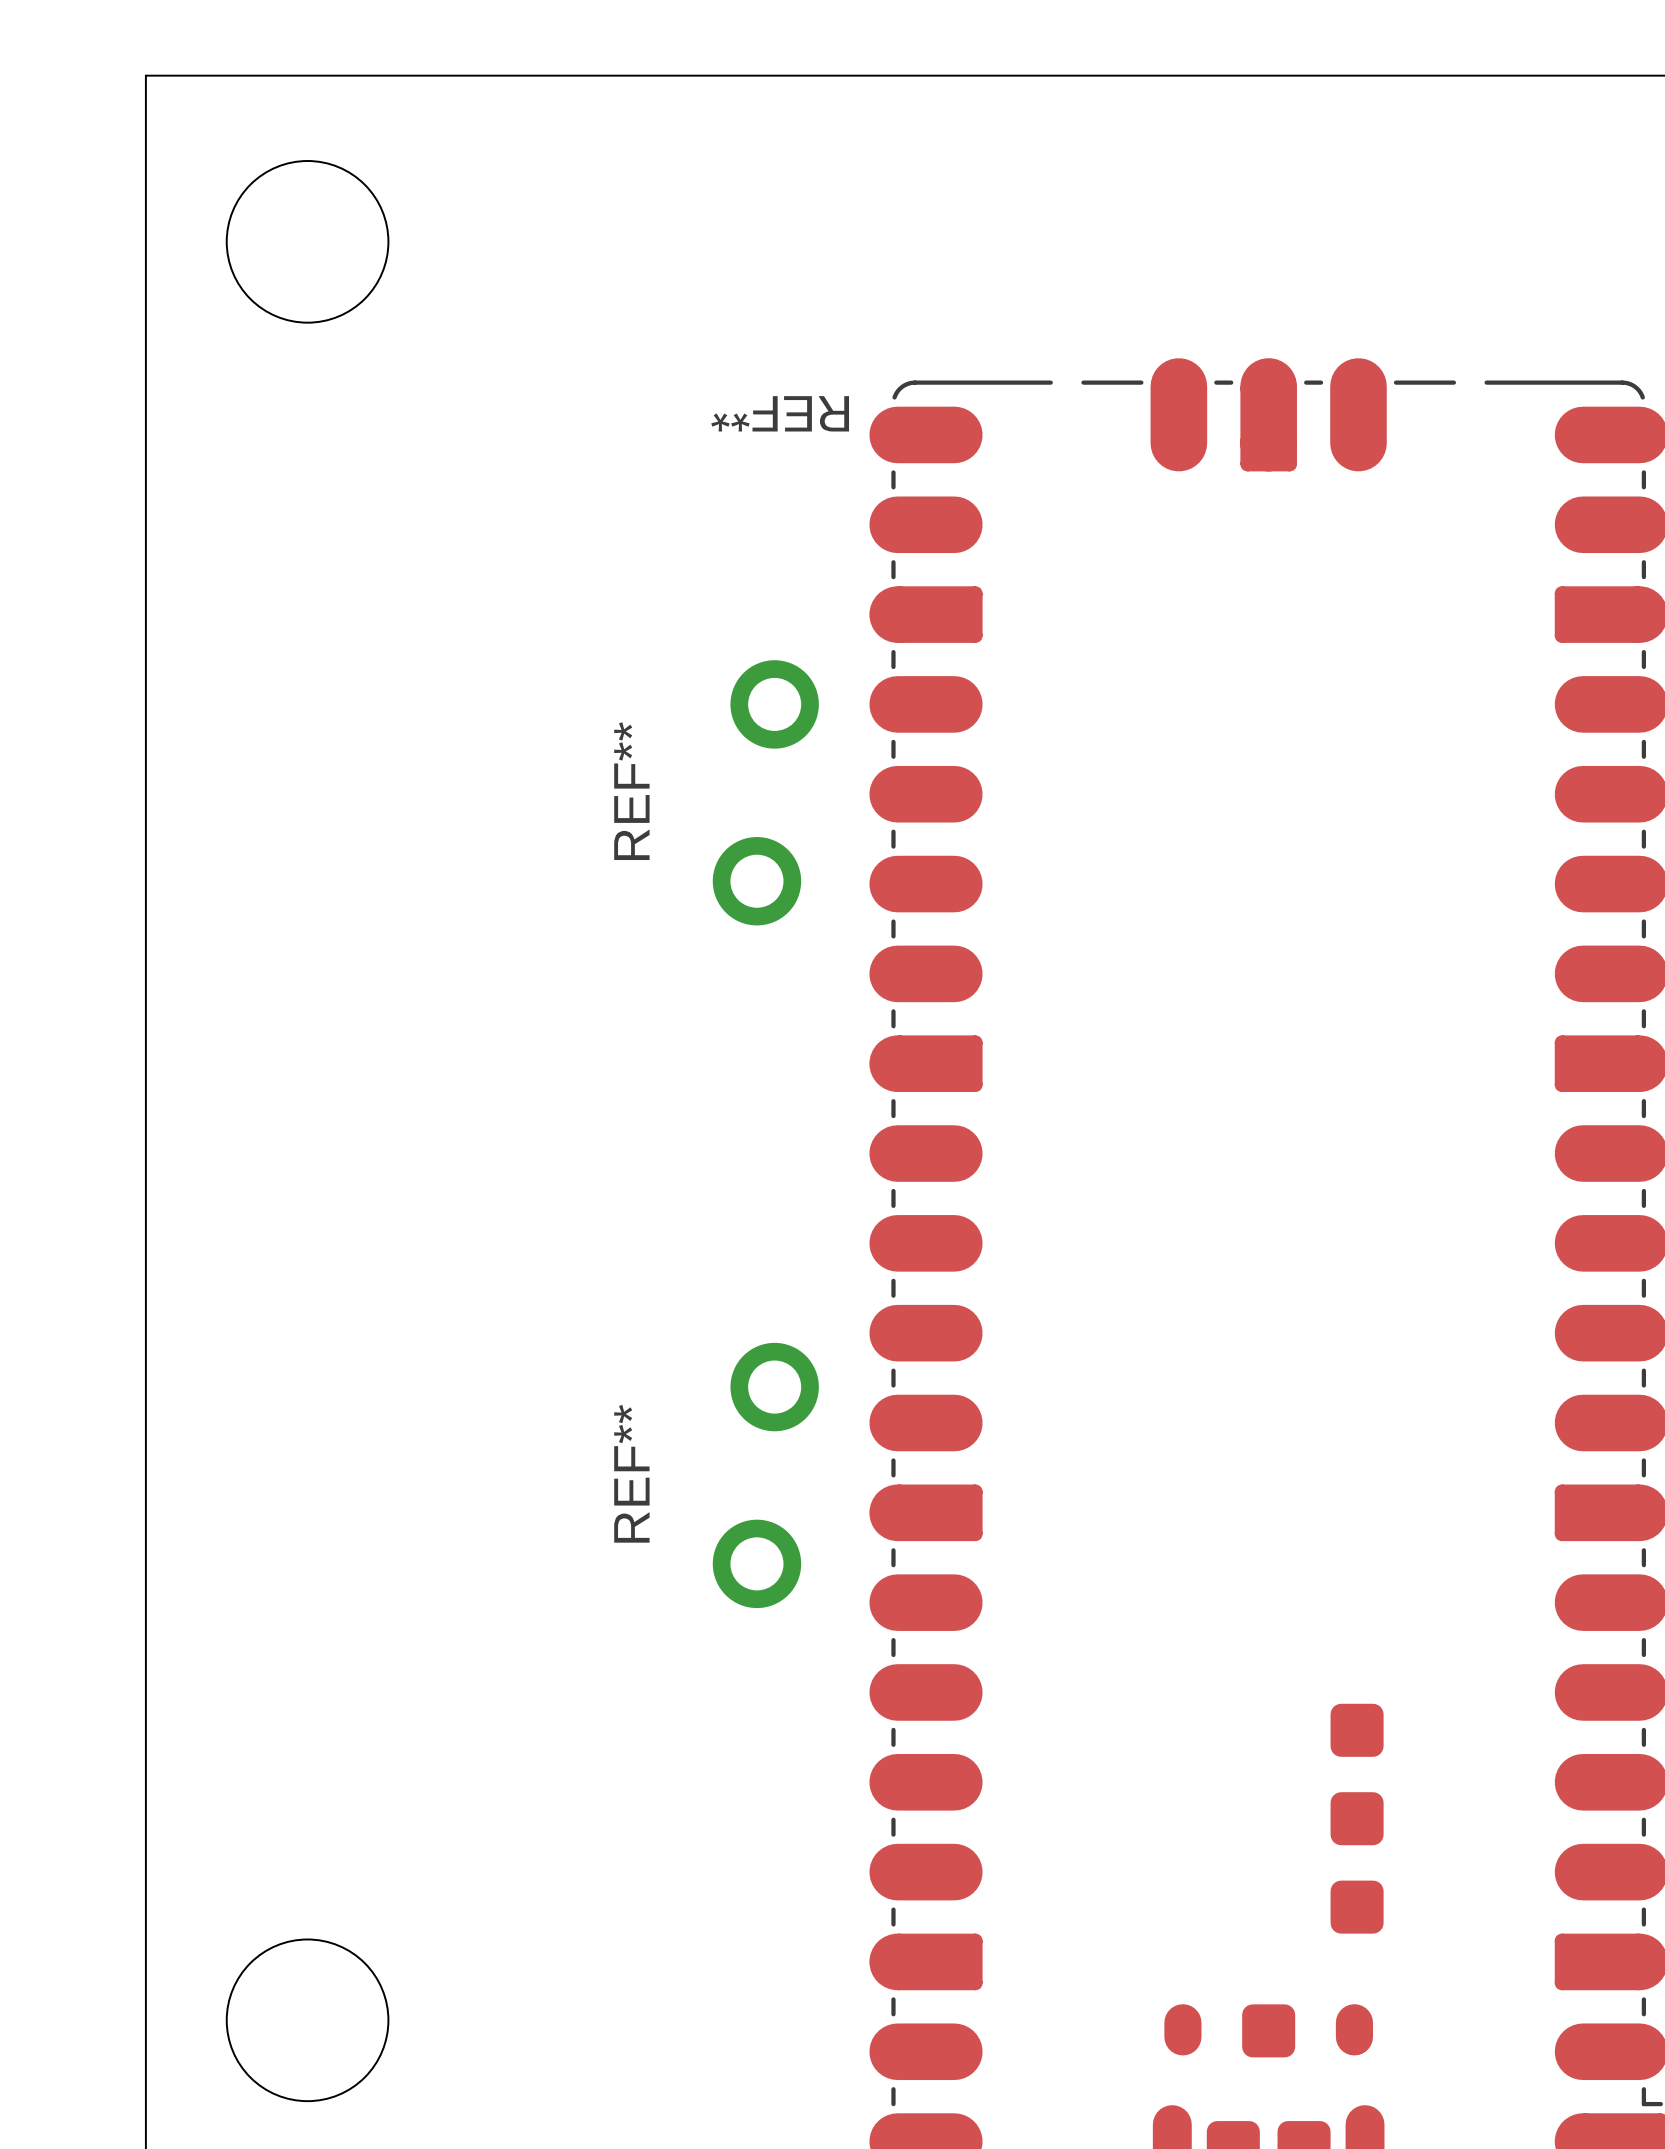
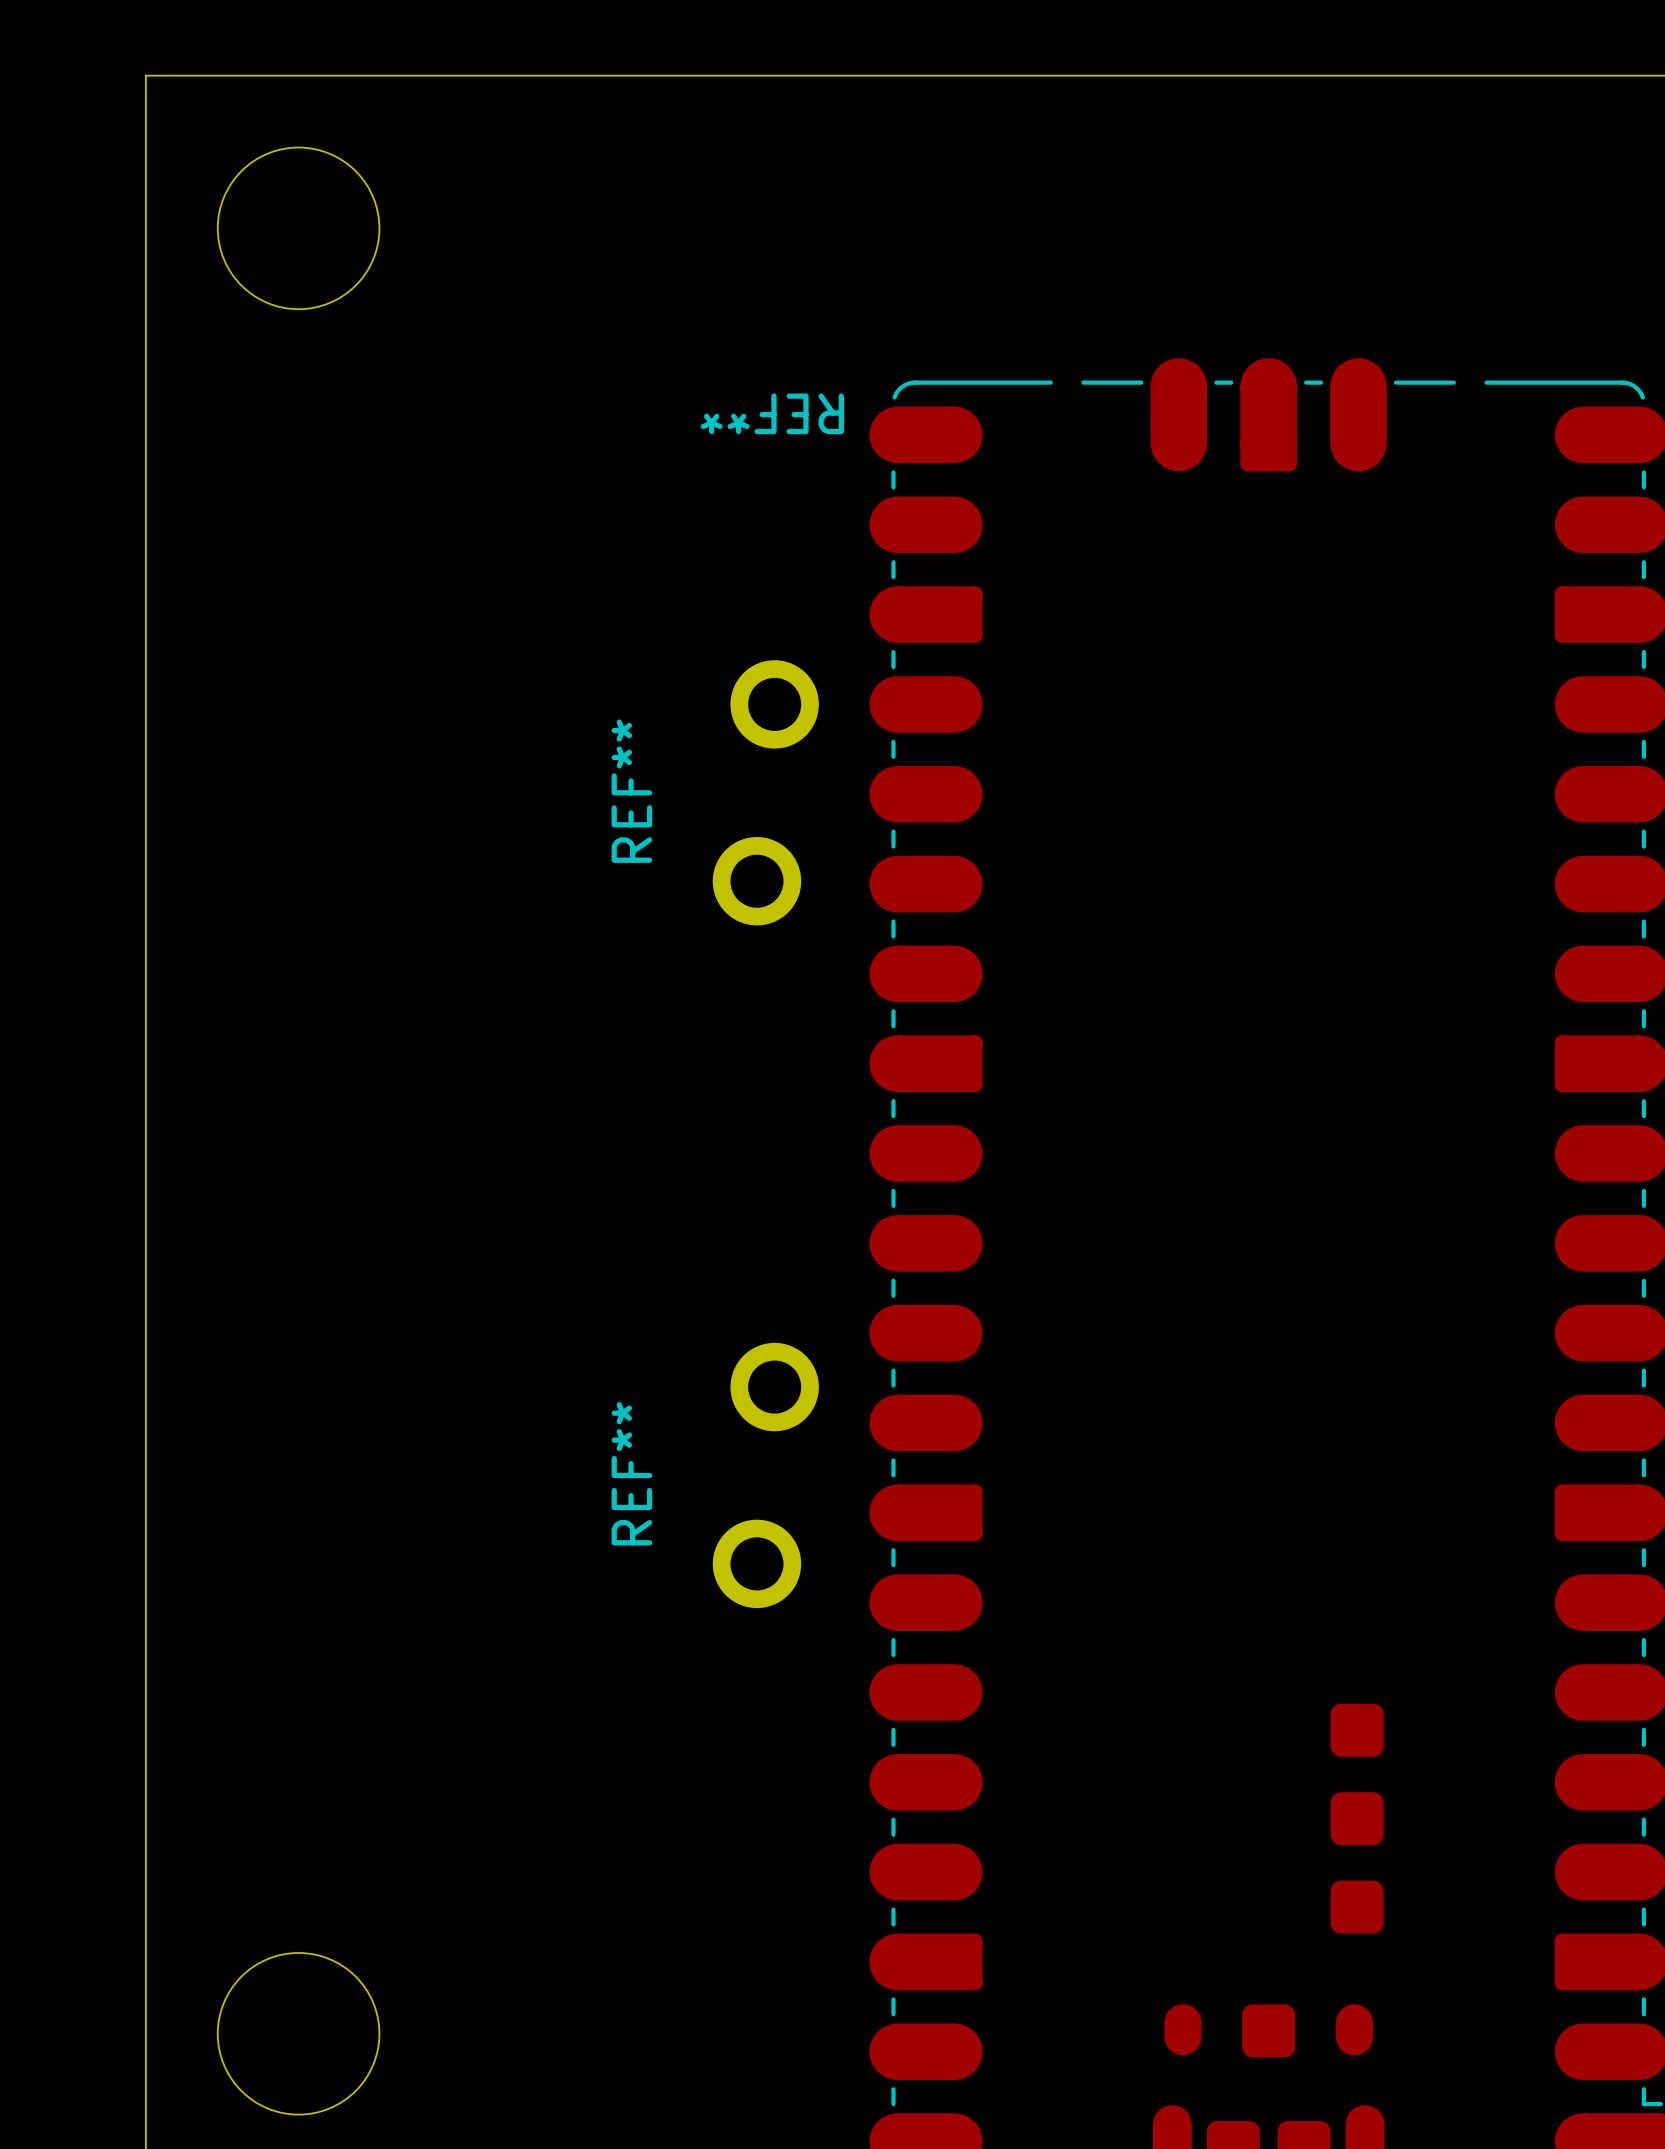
round board edge position: (307, 241) -> (298, 228)
round board edge position: (307, 2020) -> (298, 2033)

